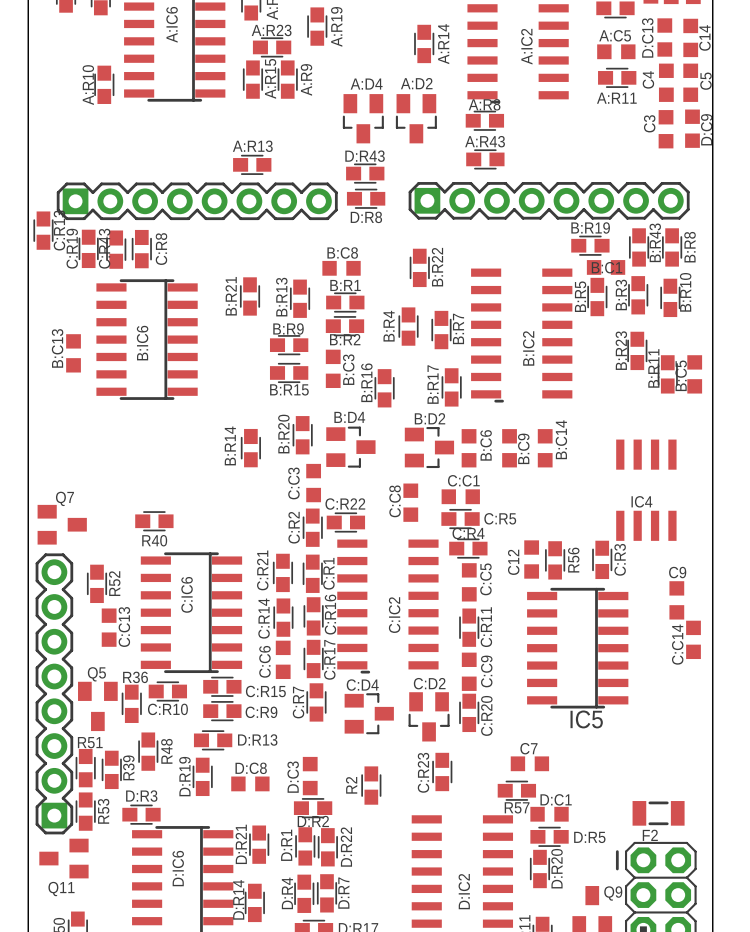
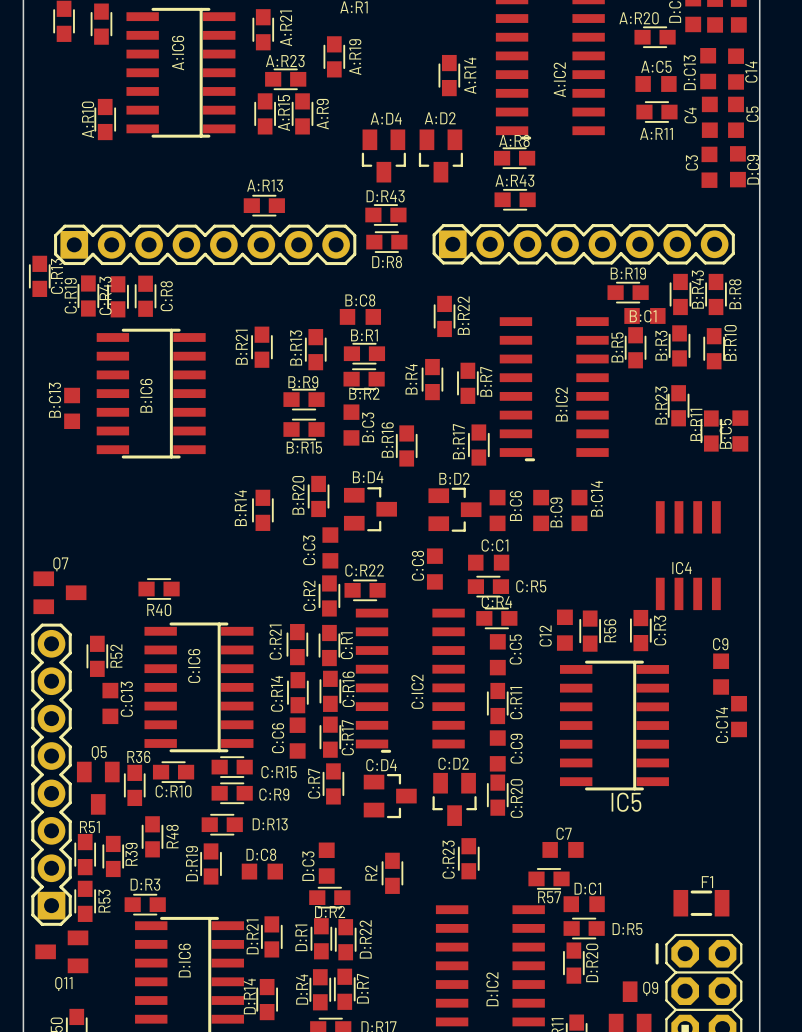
F2 name: F2 (650, 835) -> F1 (707, 882)

